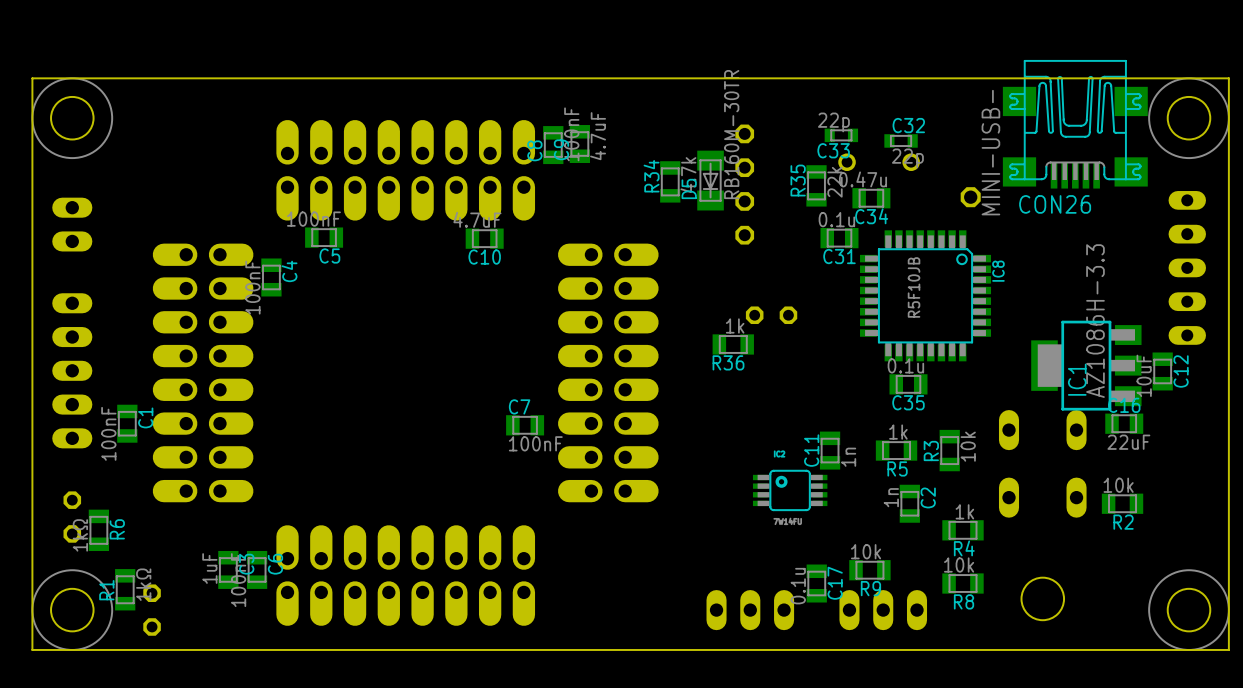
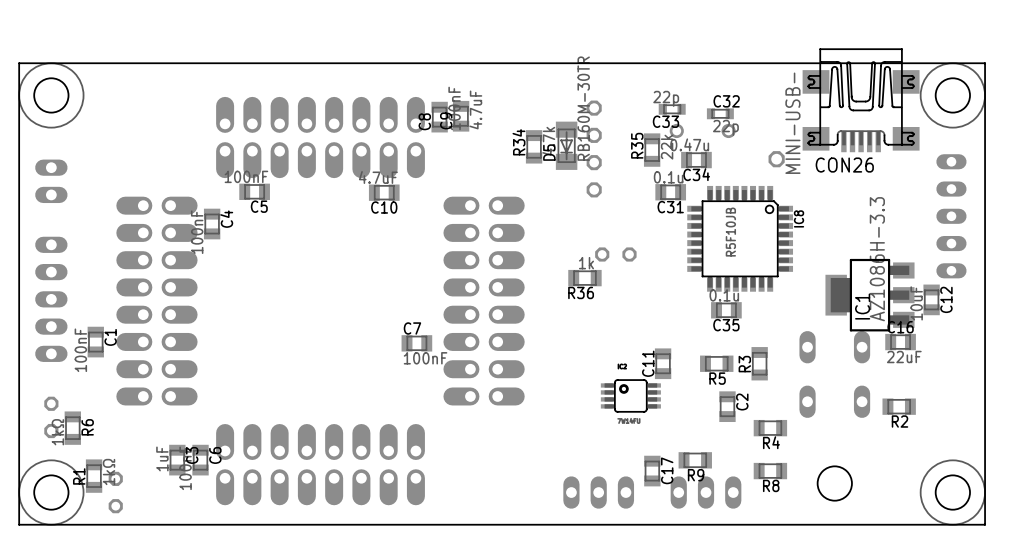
R5 value: 1k (898, 432) -> none
R3 value: 10k (968, 446) -> none
C11 value: 1n (848, 457) -> none
R2 value: 10k (1118, 485) -> none
C2 value: 1n (891, 497) -> none
R4 value: 1k (964, 511) -> none
R9 value: 10k (866, 551) -> none
R8 value: 10k (959, 565) -> none
C17 value: 0.1u (798, 586) -> none

